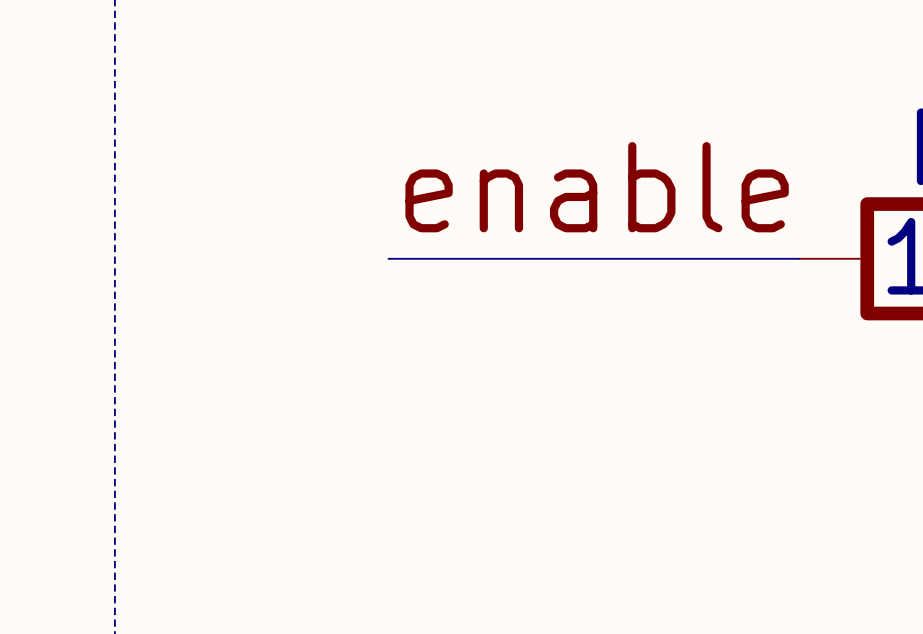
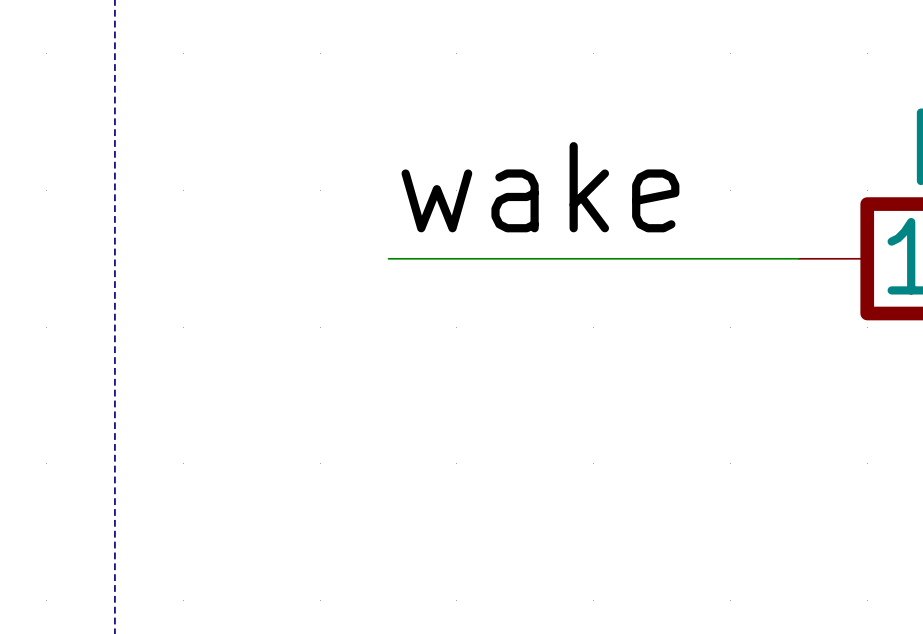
label: enable (597, 187) -> wake (540, 187)

